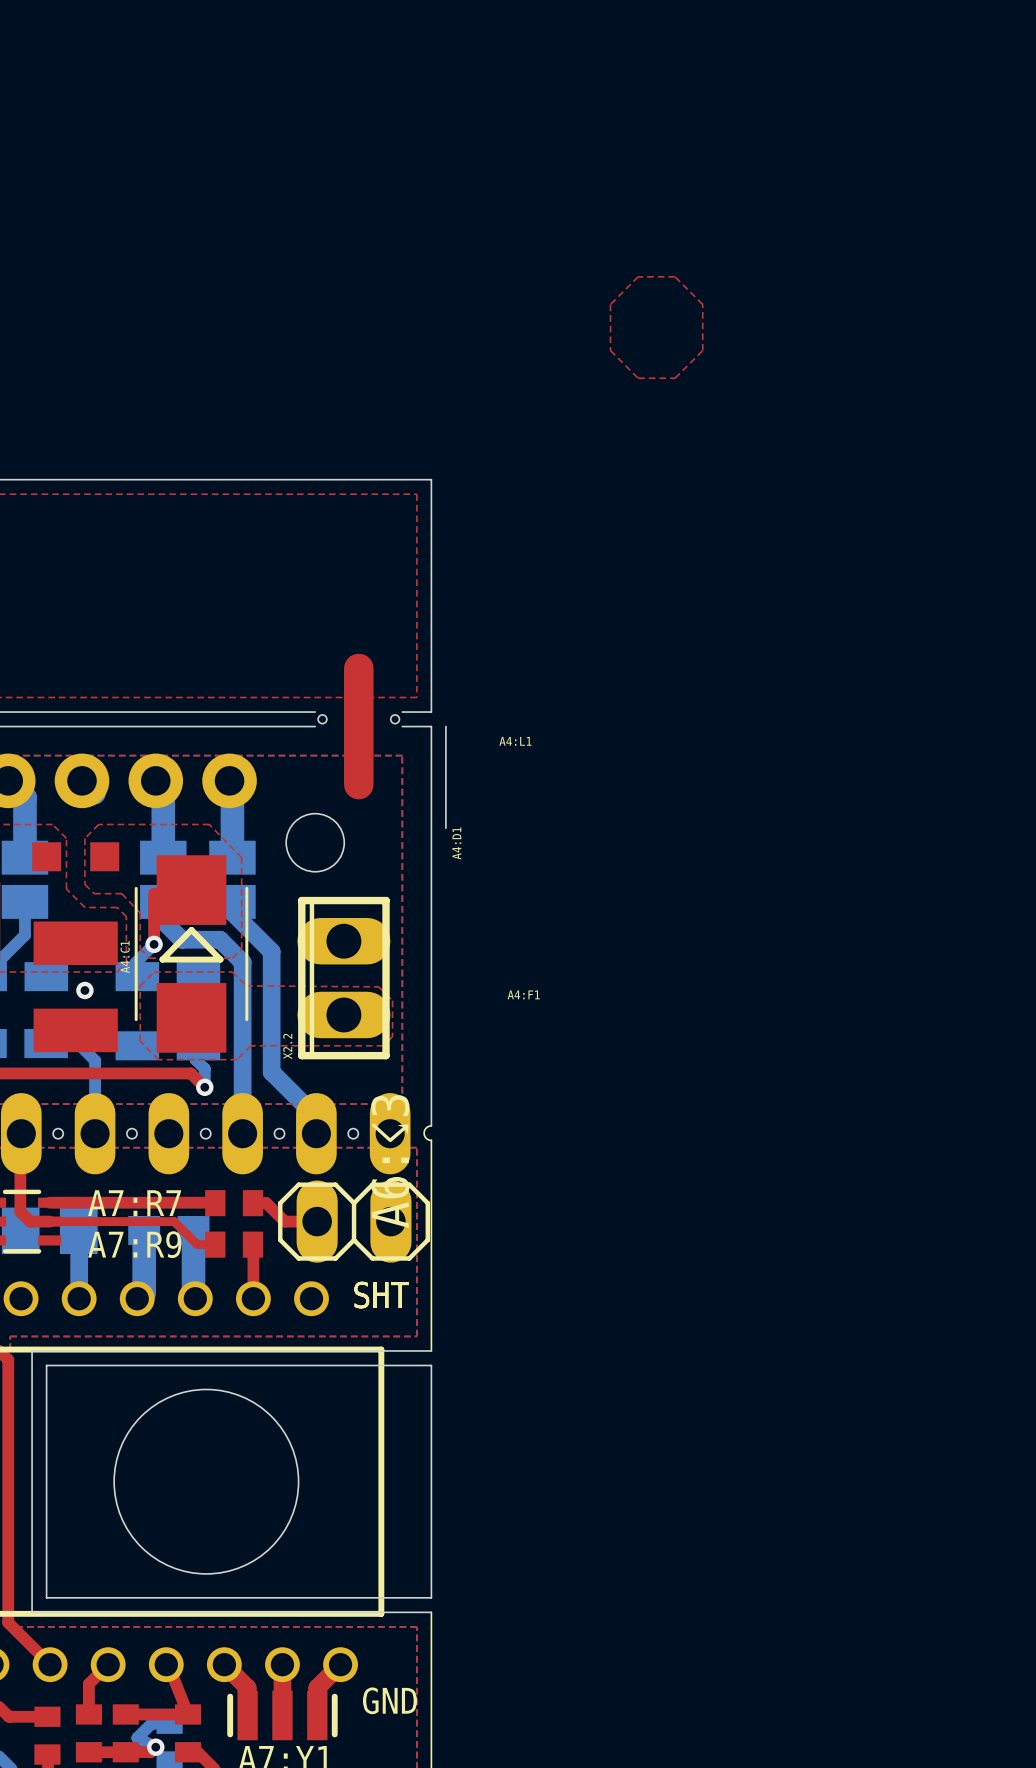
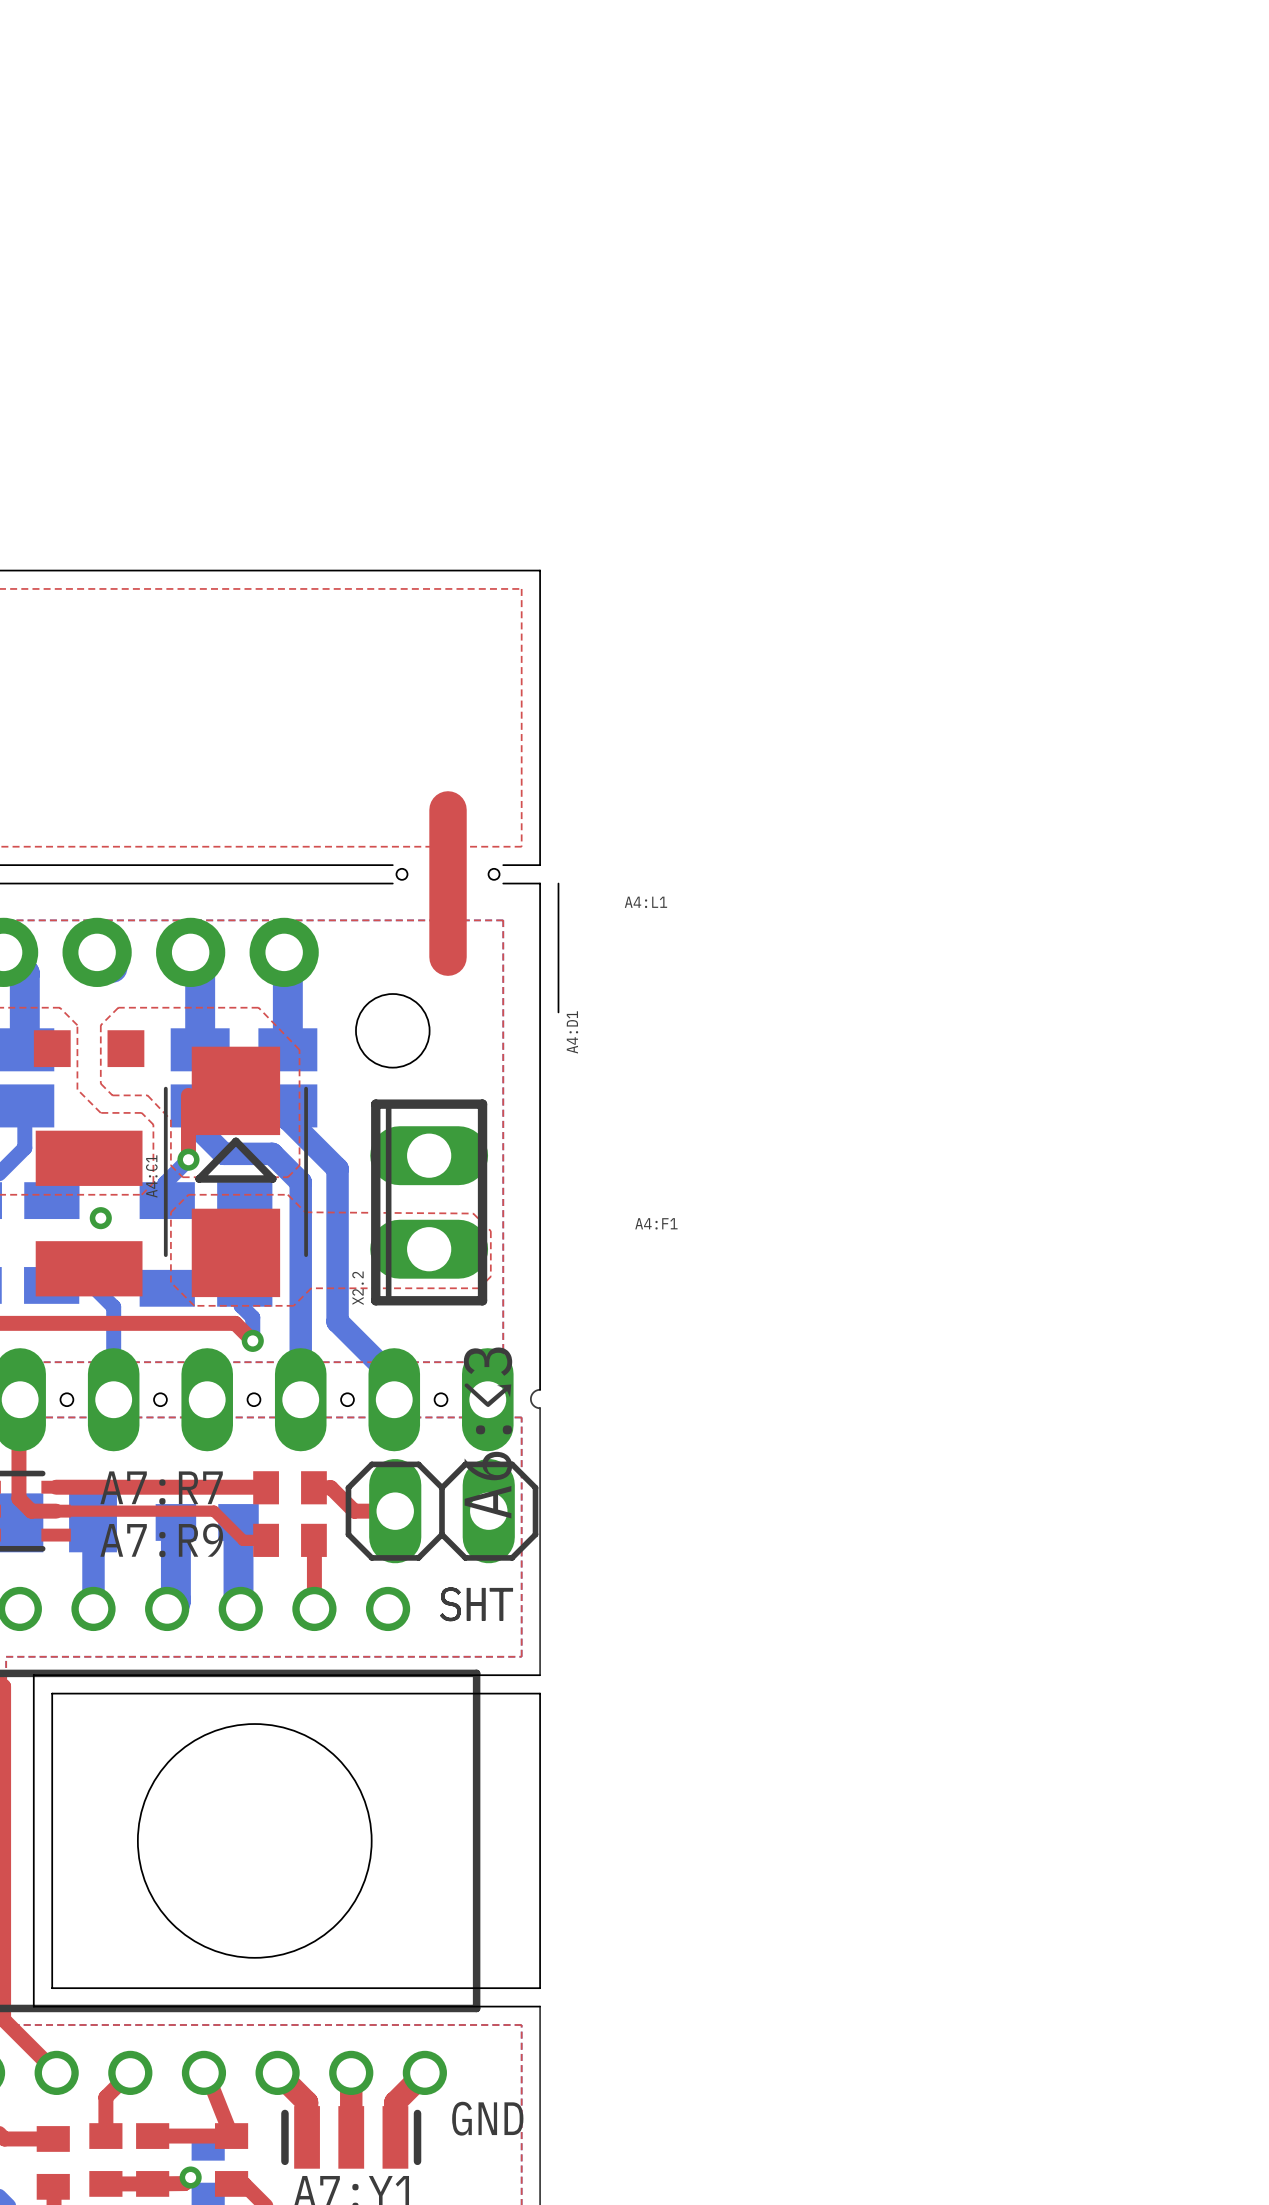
top zone outline: (638, 276) (675, 276) (702, 304) (702, 350) (675, 378) (638, 378) (610, 350) (610, 304) (638, 276) -> none
bottom track: (169, 1723) (151, 1723) (137, 1737) (155, 1747) -> none

